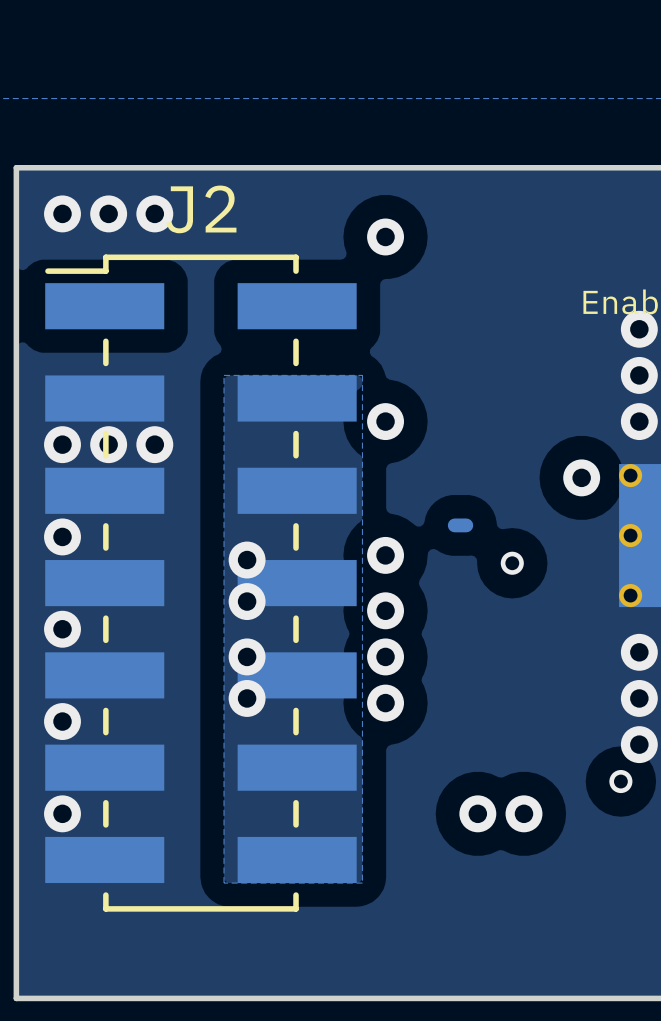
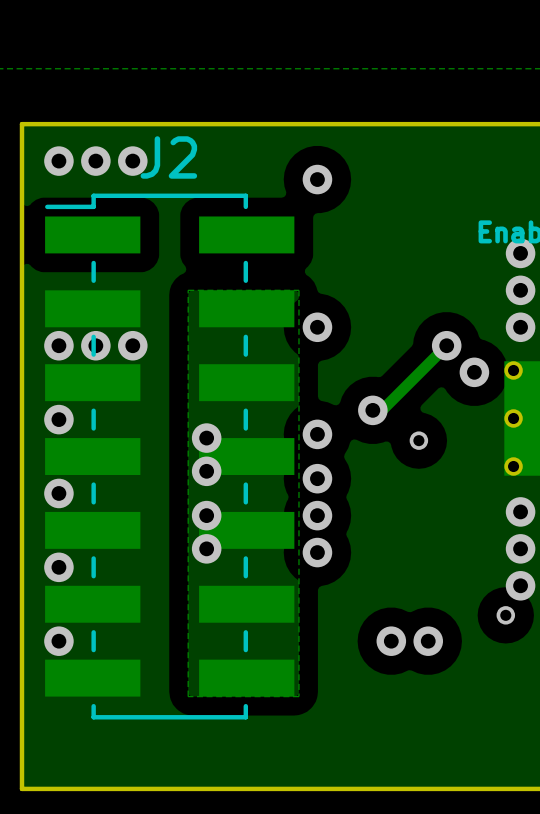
track: none -> (446, 345) (382, 410)
via: none -> (446, 345)
via: none -> (372, 410)

